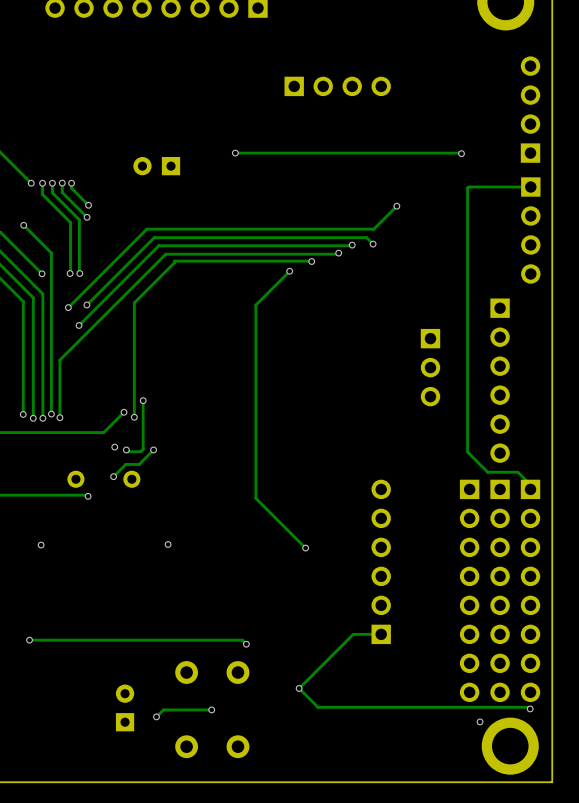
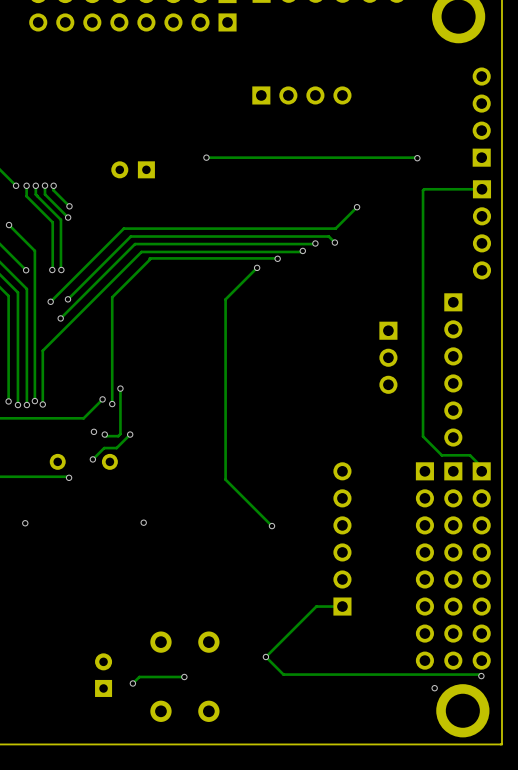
track: (29, 640) (242, 640) (246, 644) -> none
via: (29, 640) -> none
via: (246, 644) -> none

